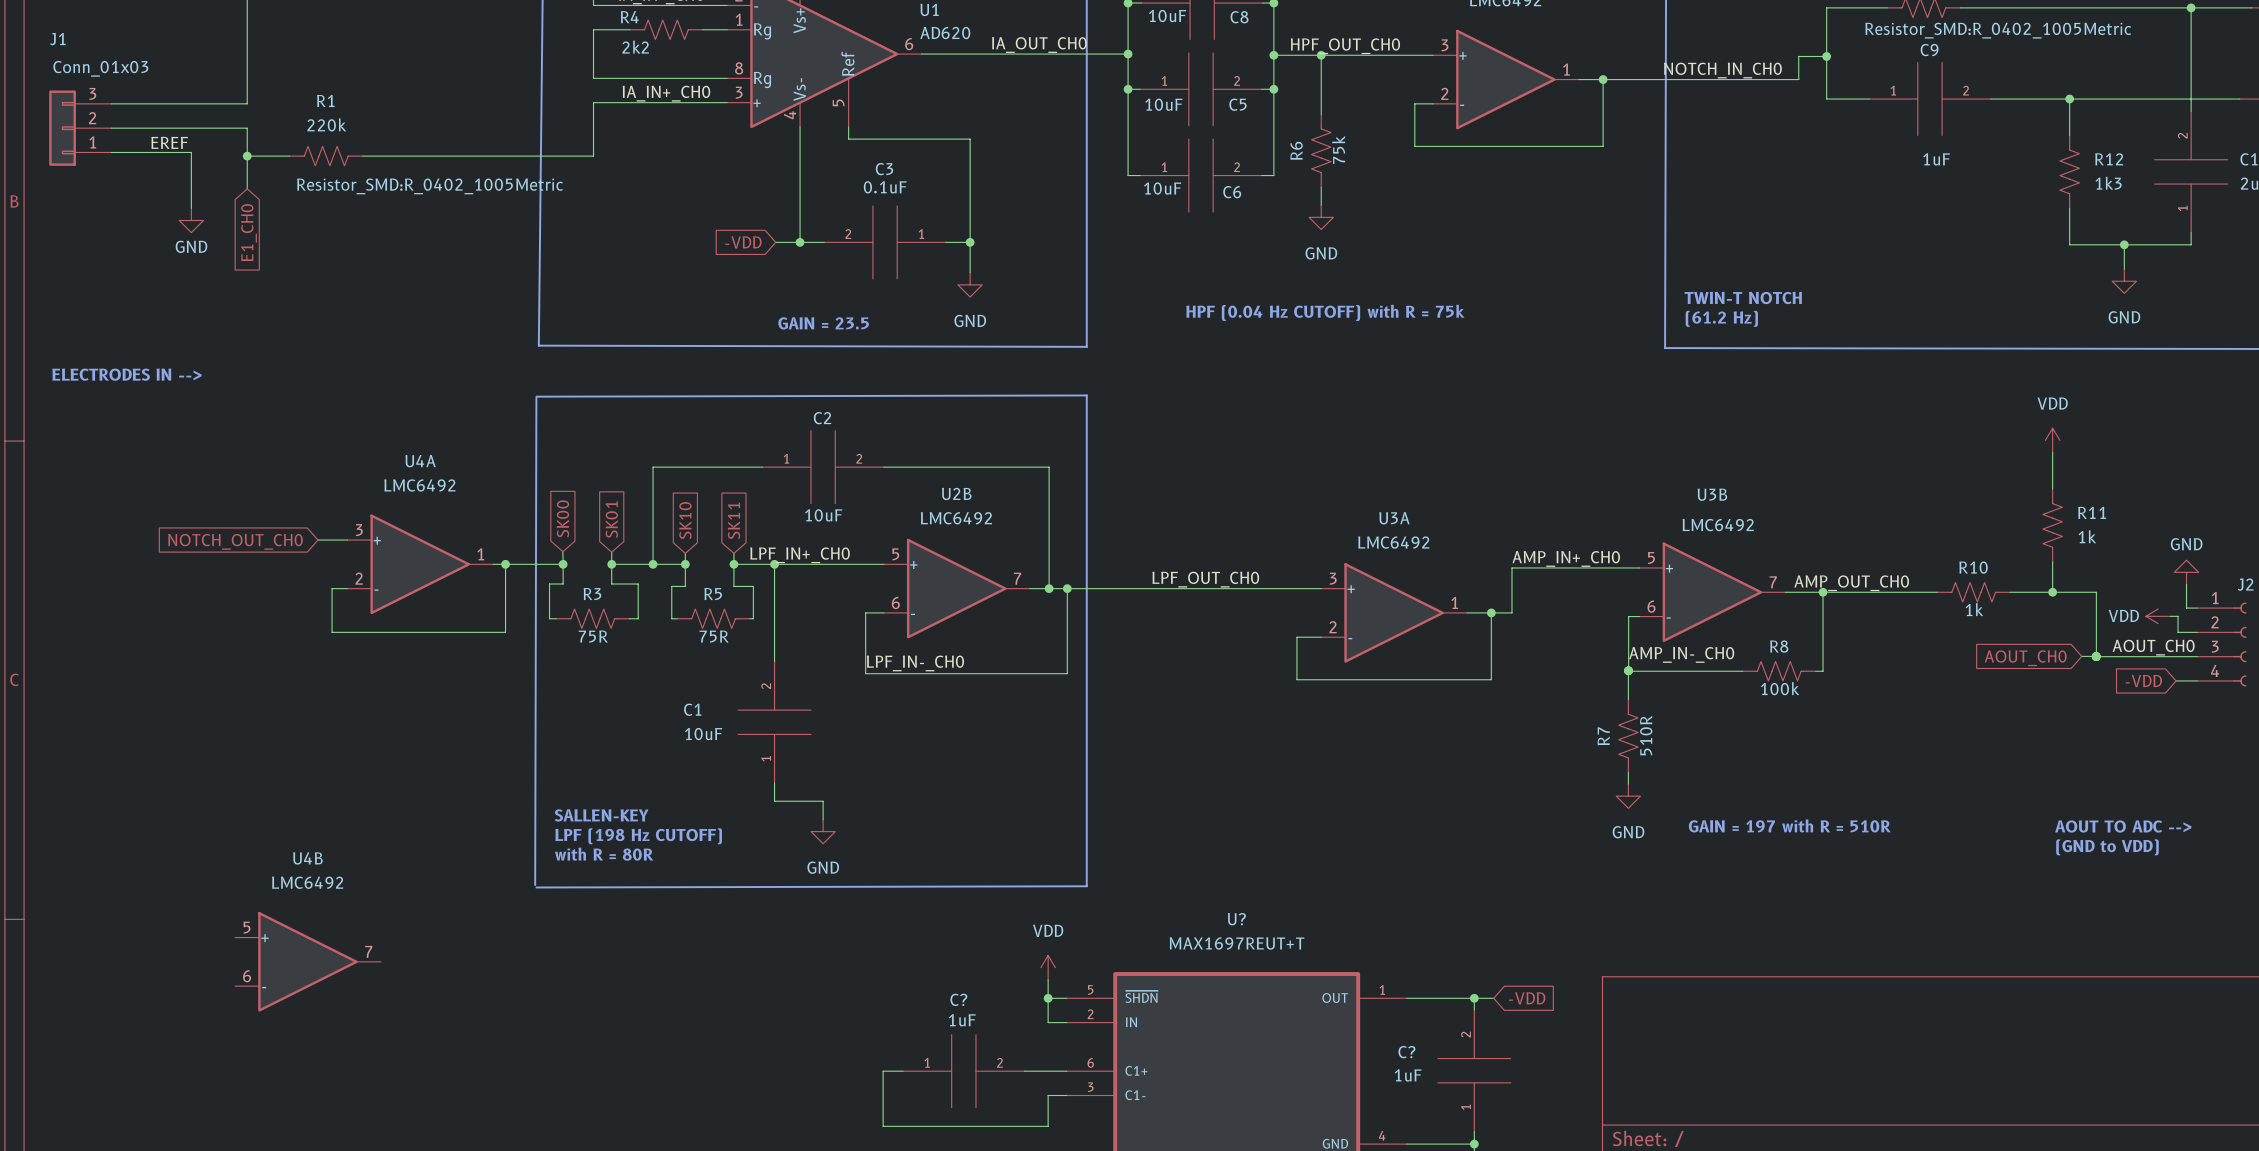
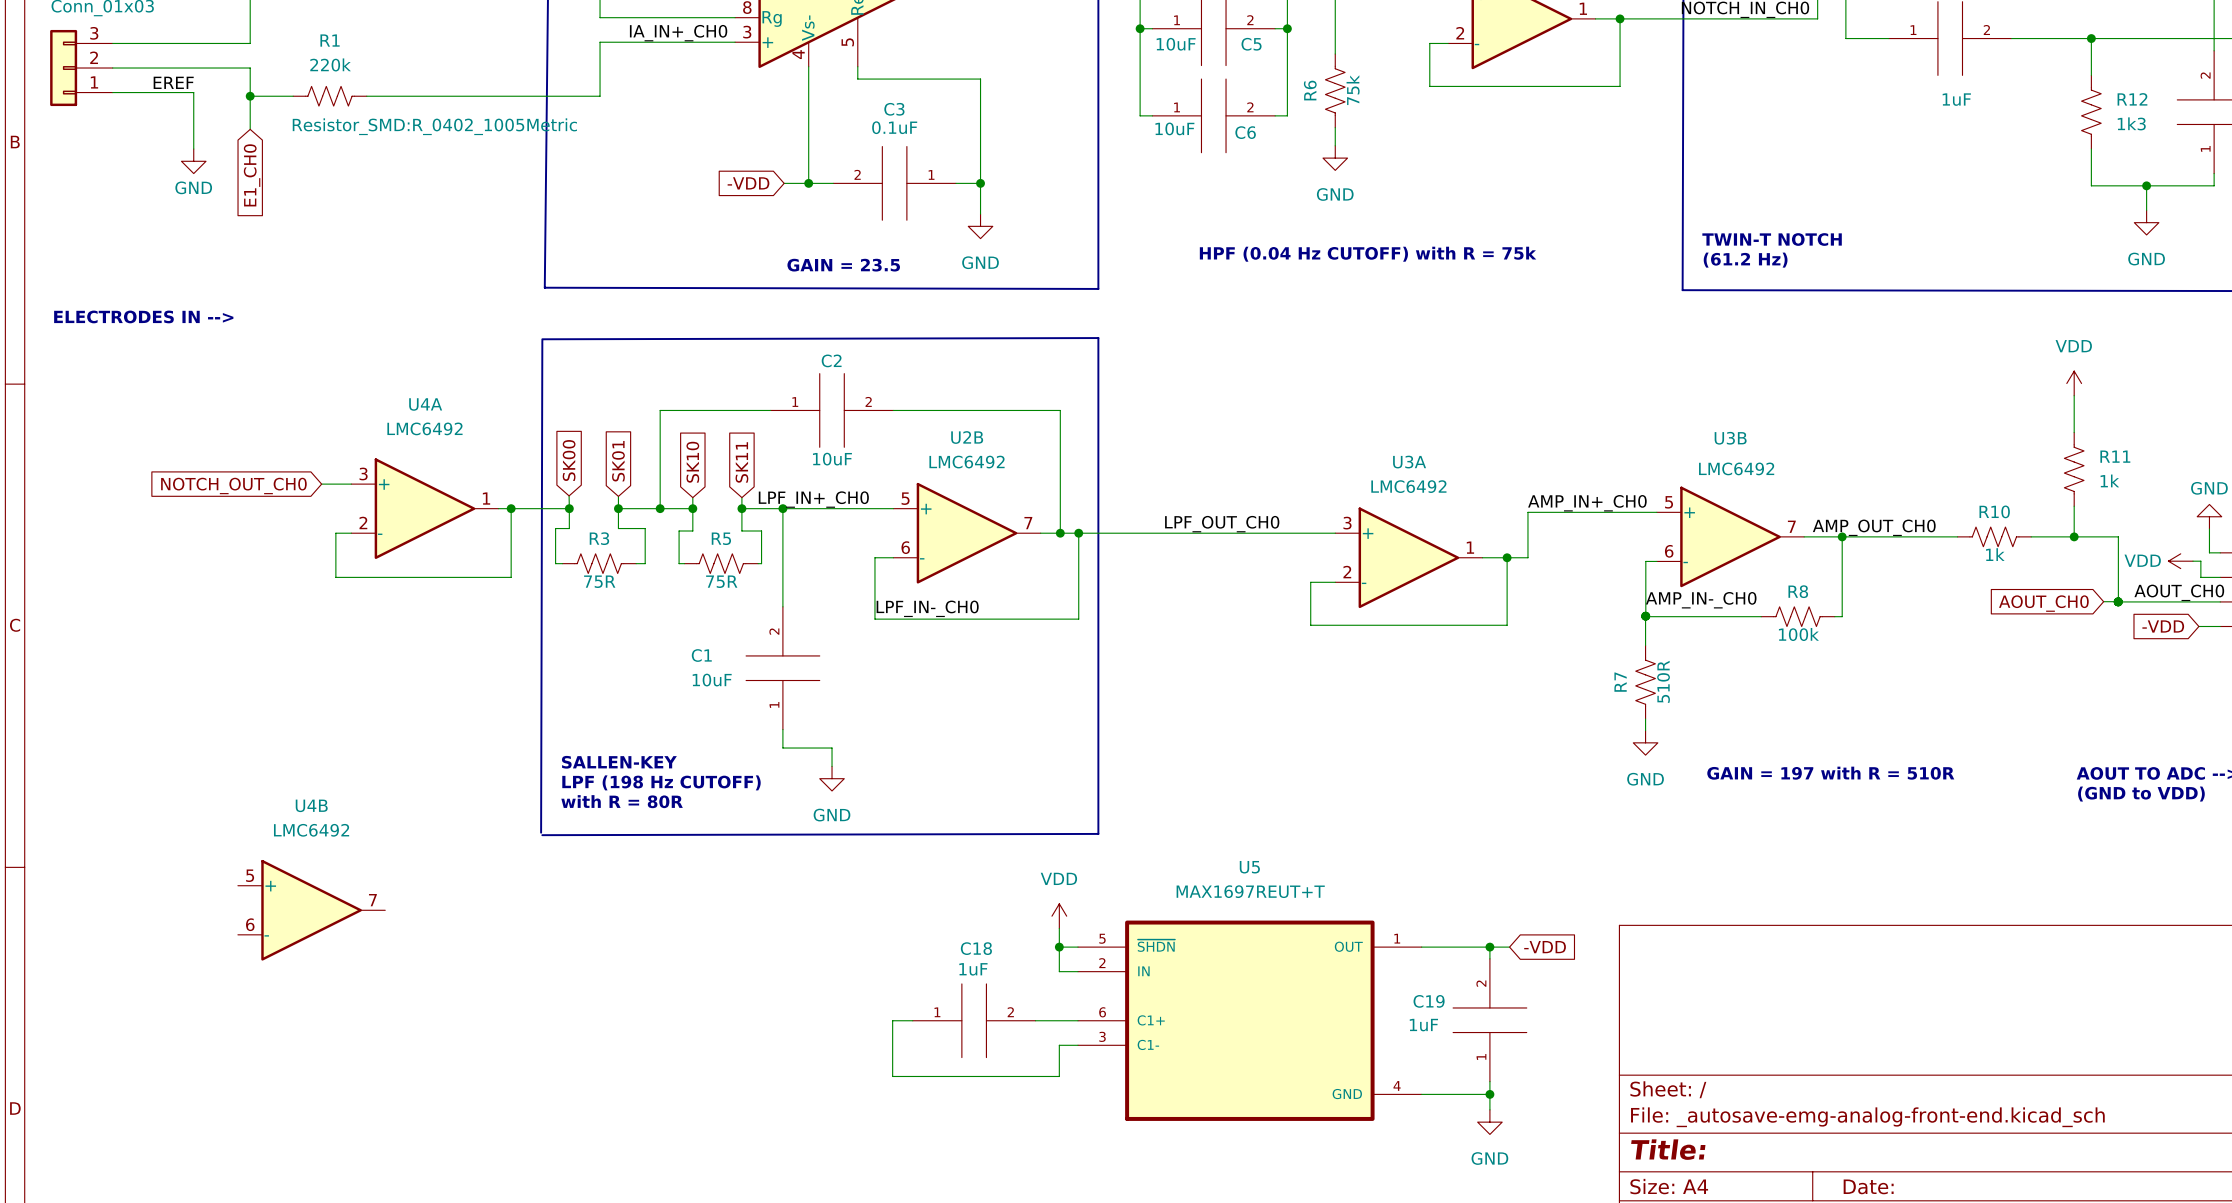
U? name: U? (1236, 919) -> U5 (1249, 867)
C? name: C? (958, 999) -> C18 (976, 948)
C? name: C? (1406, 1052) -> C19 (1429, 1001)

